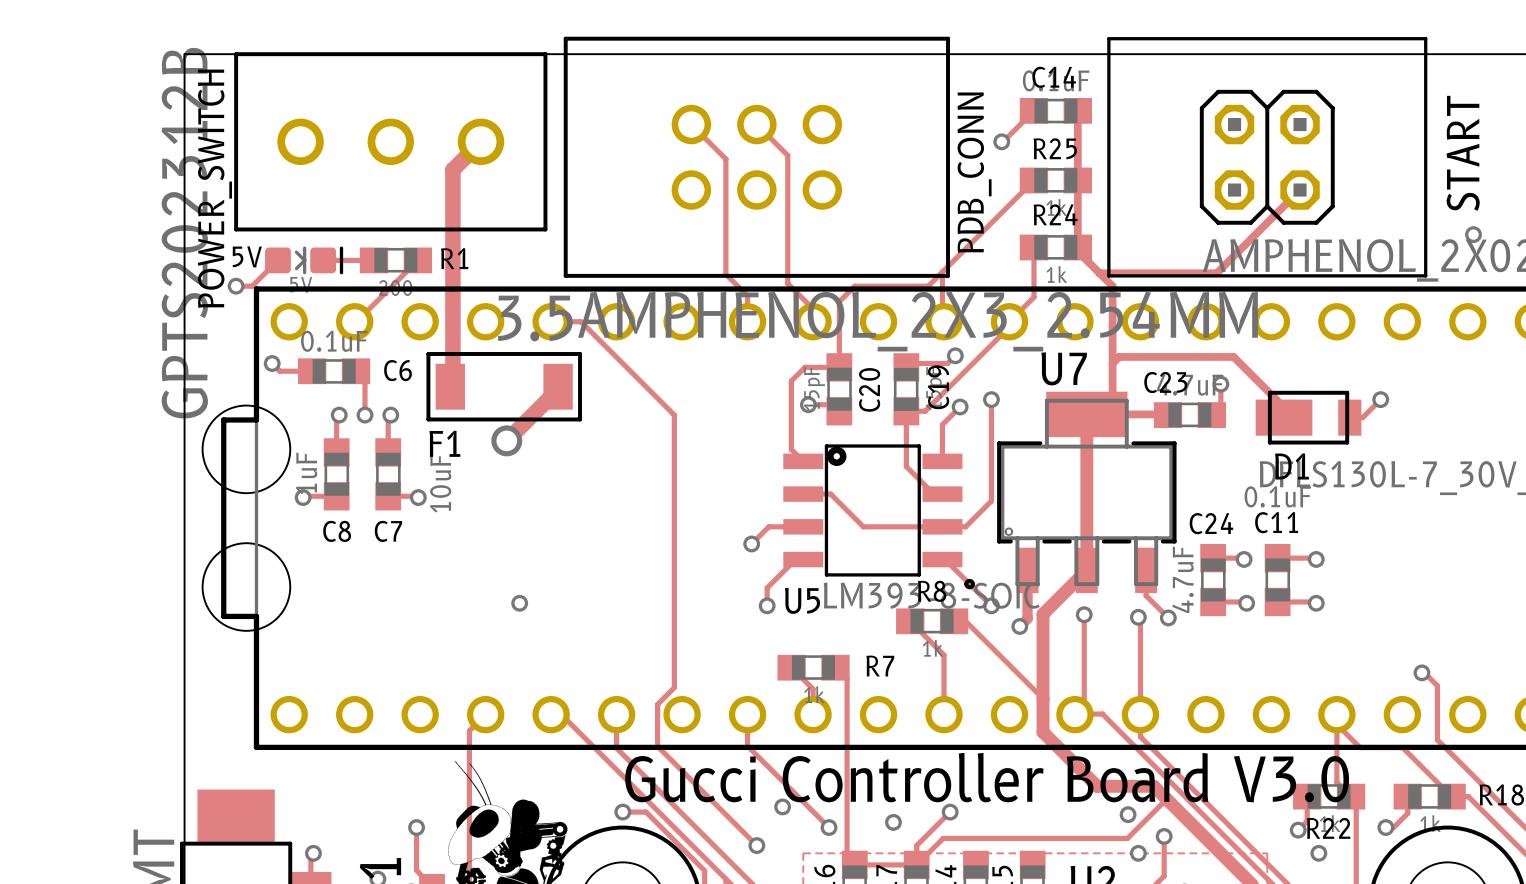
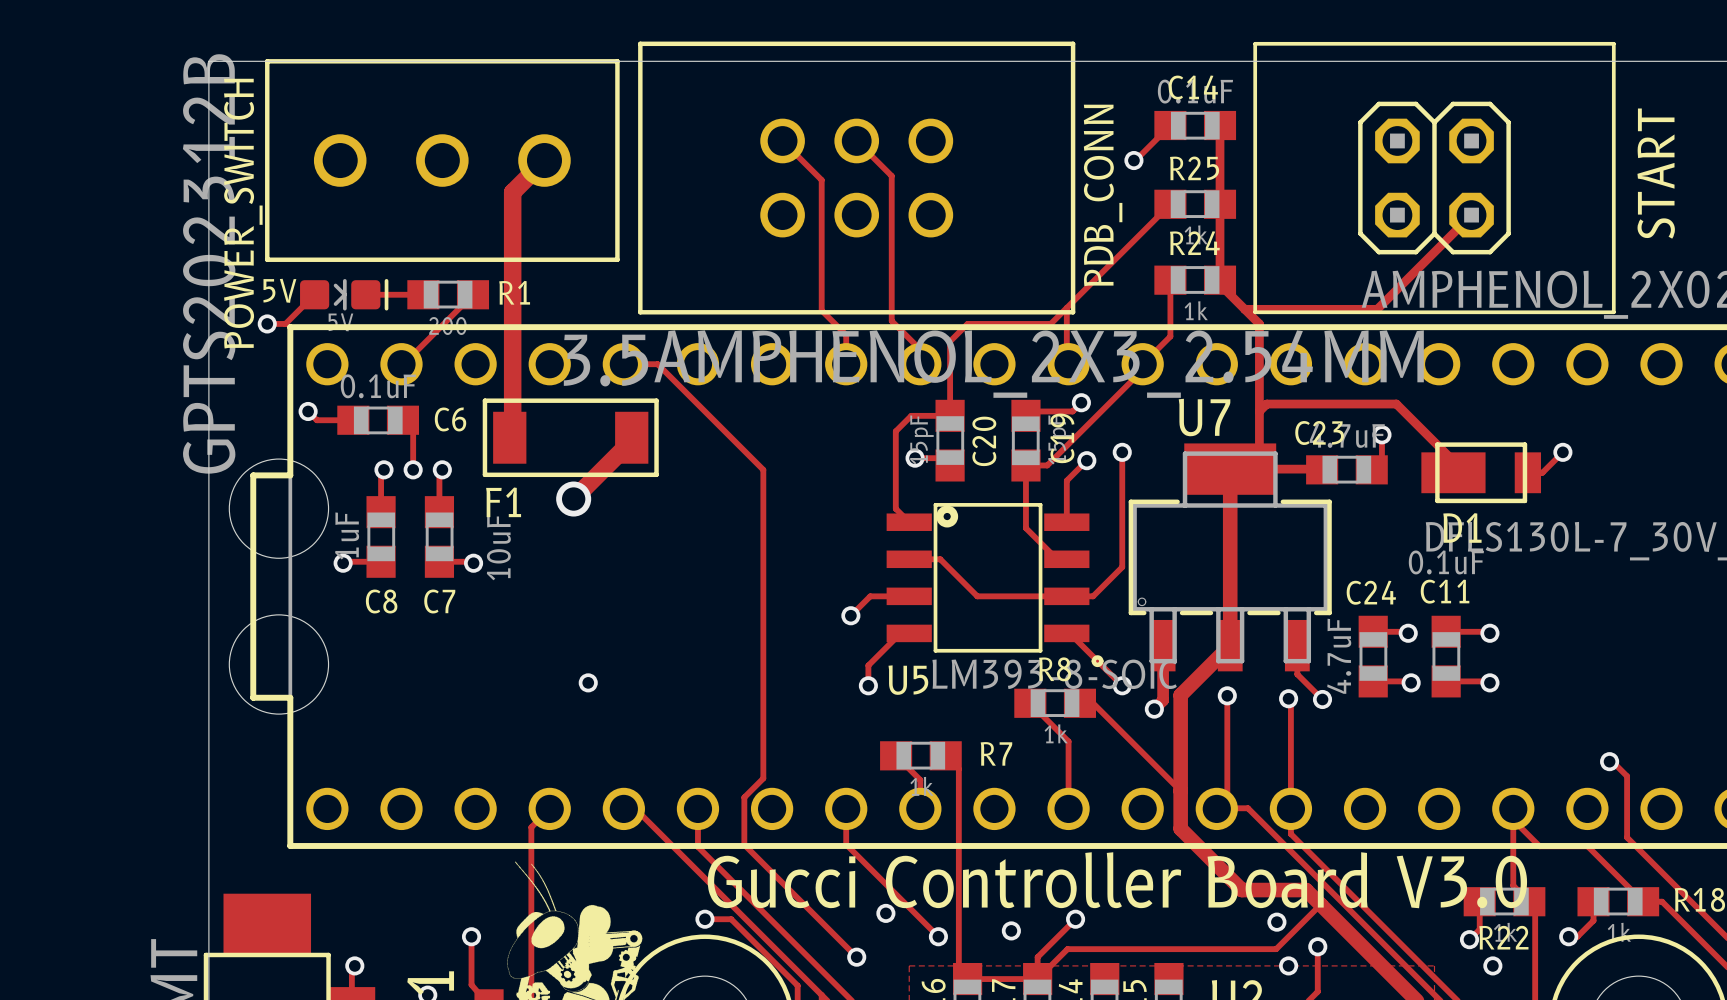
via: (1473, 234) -> none

